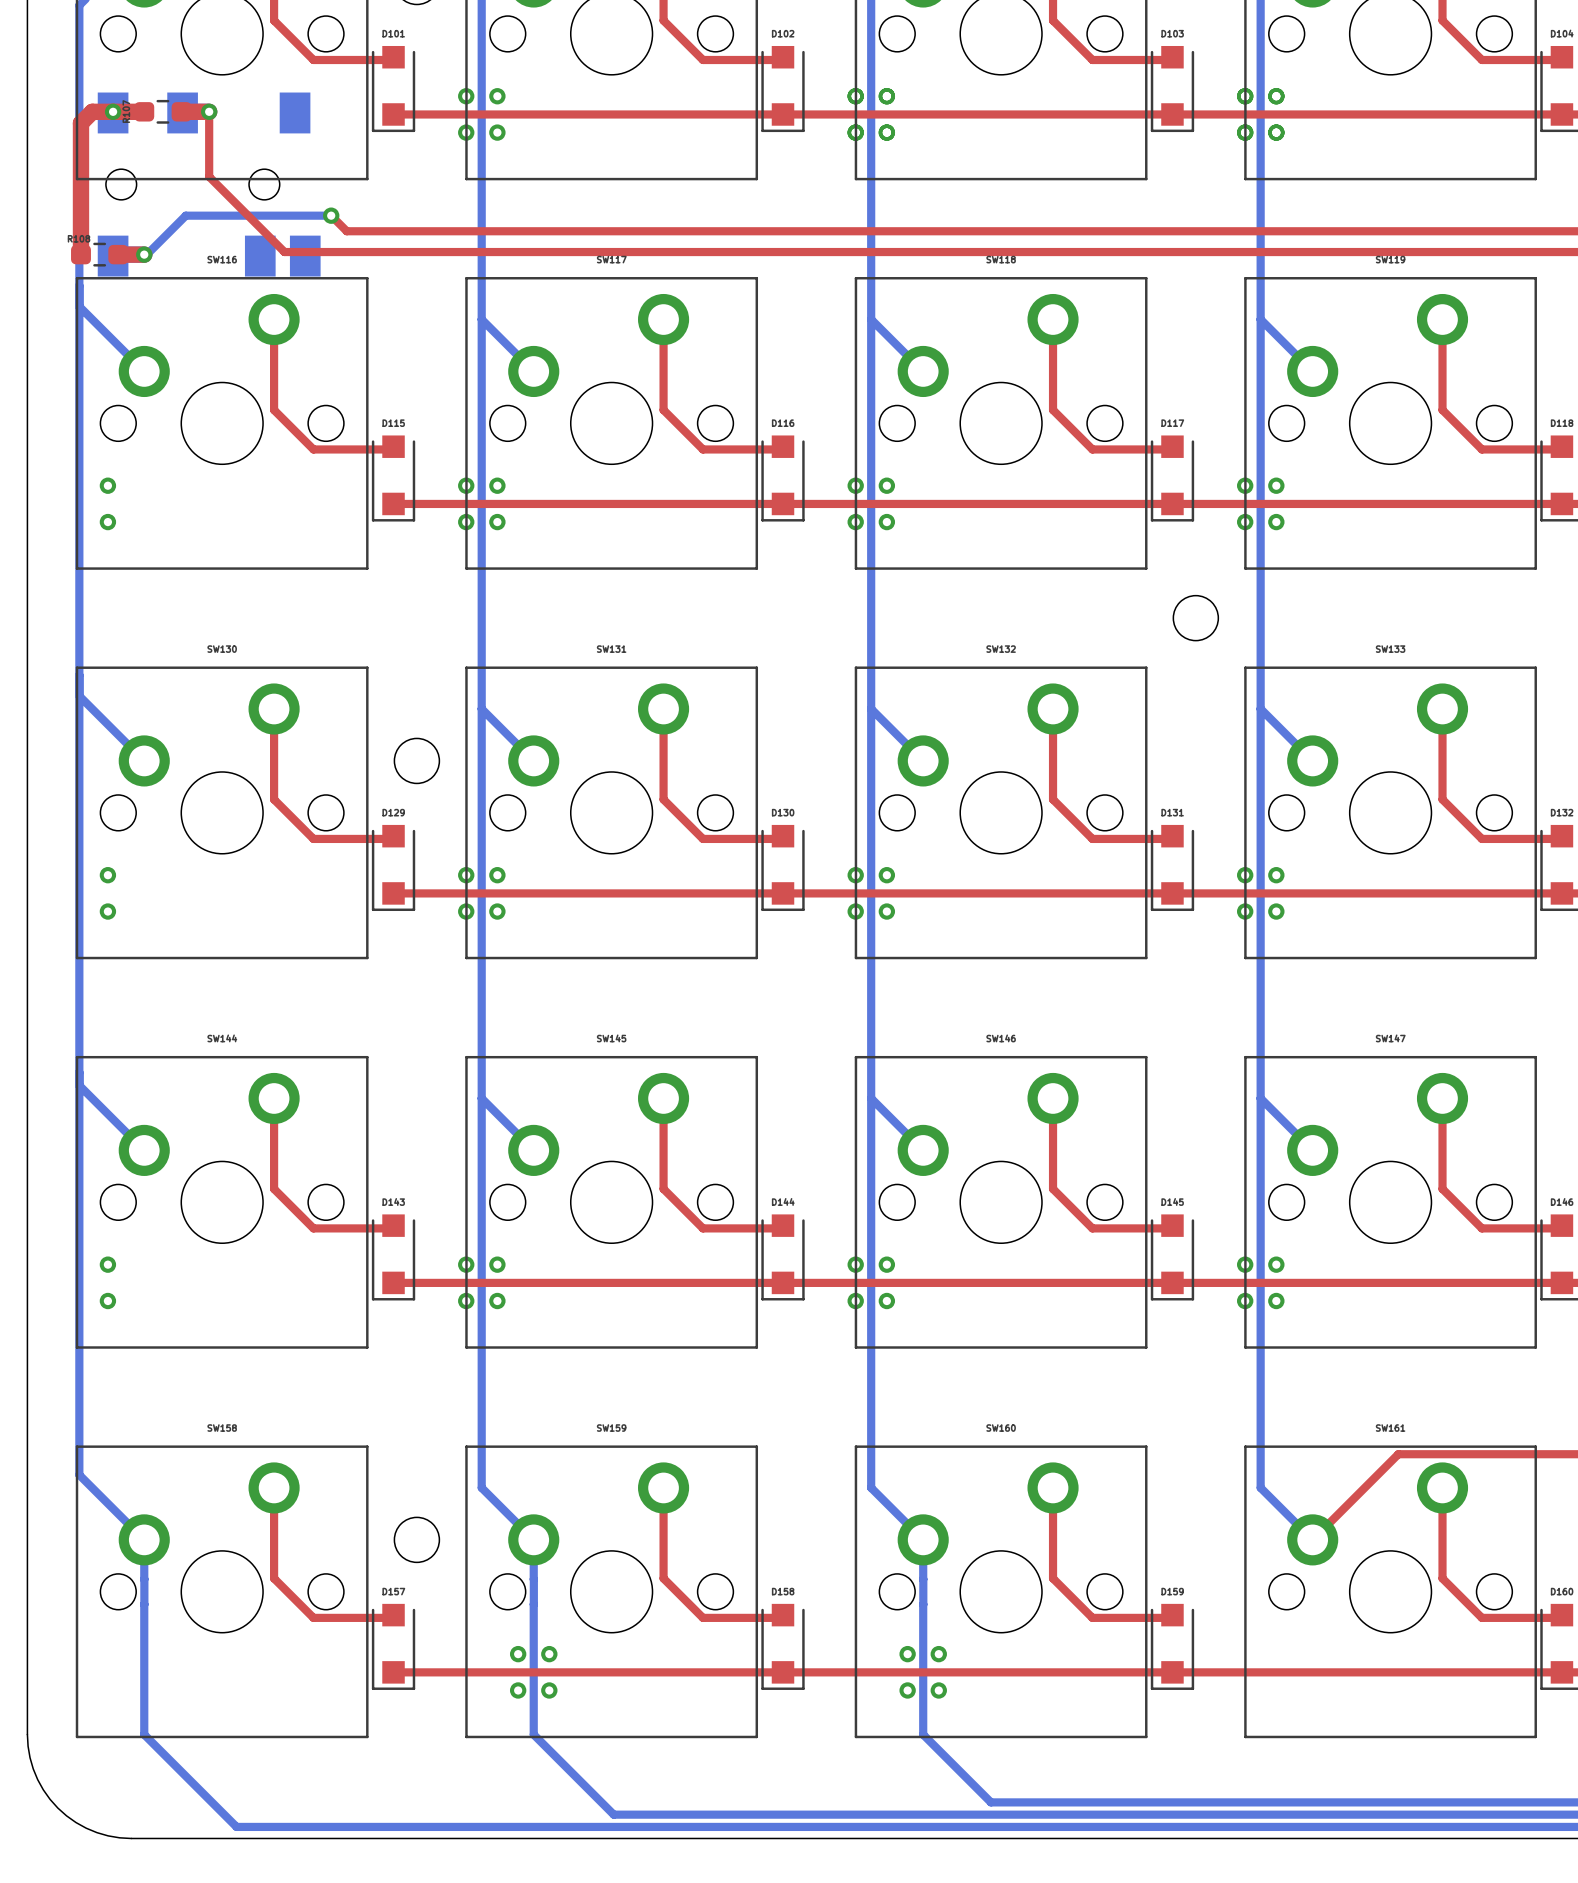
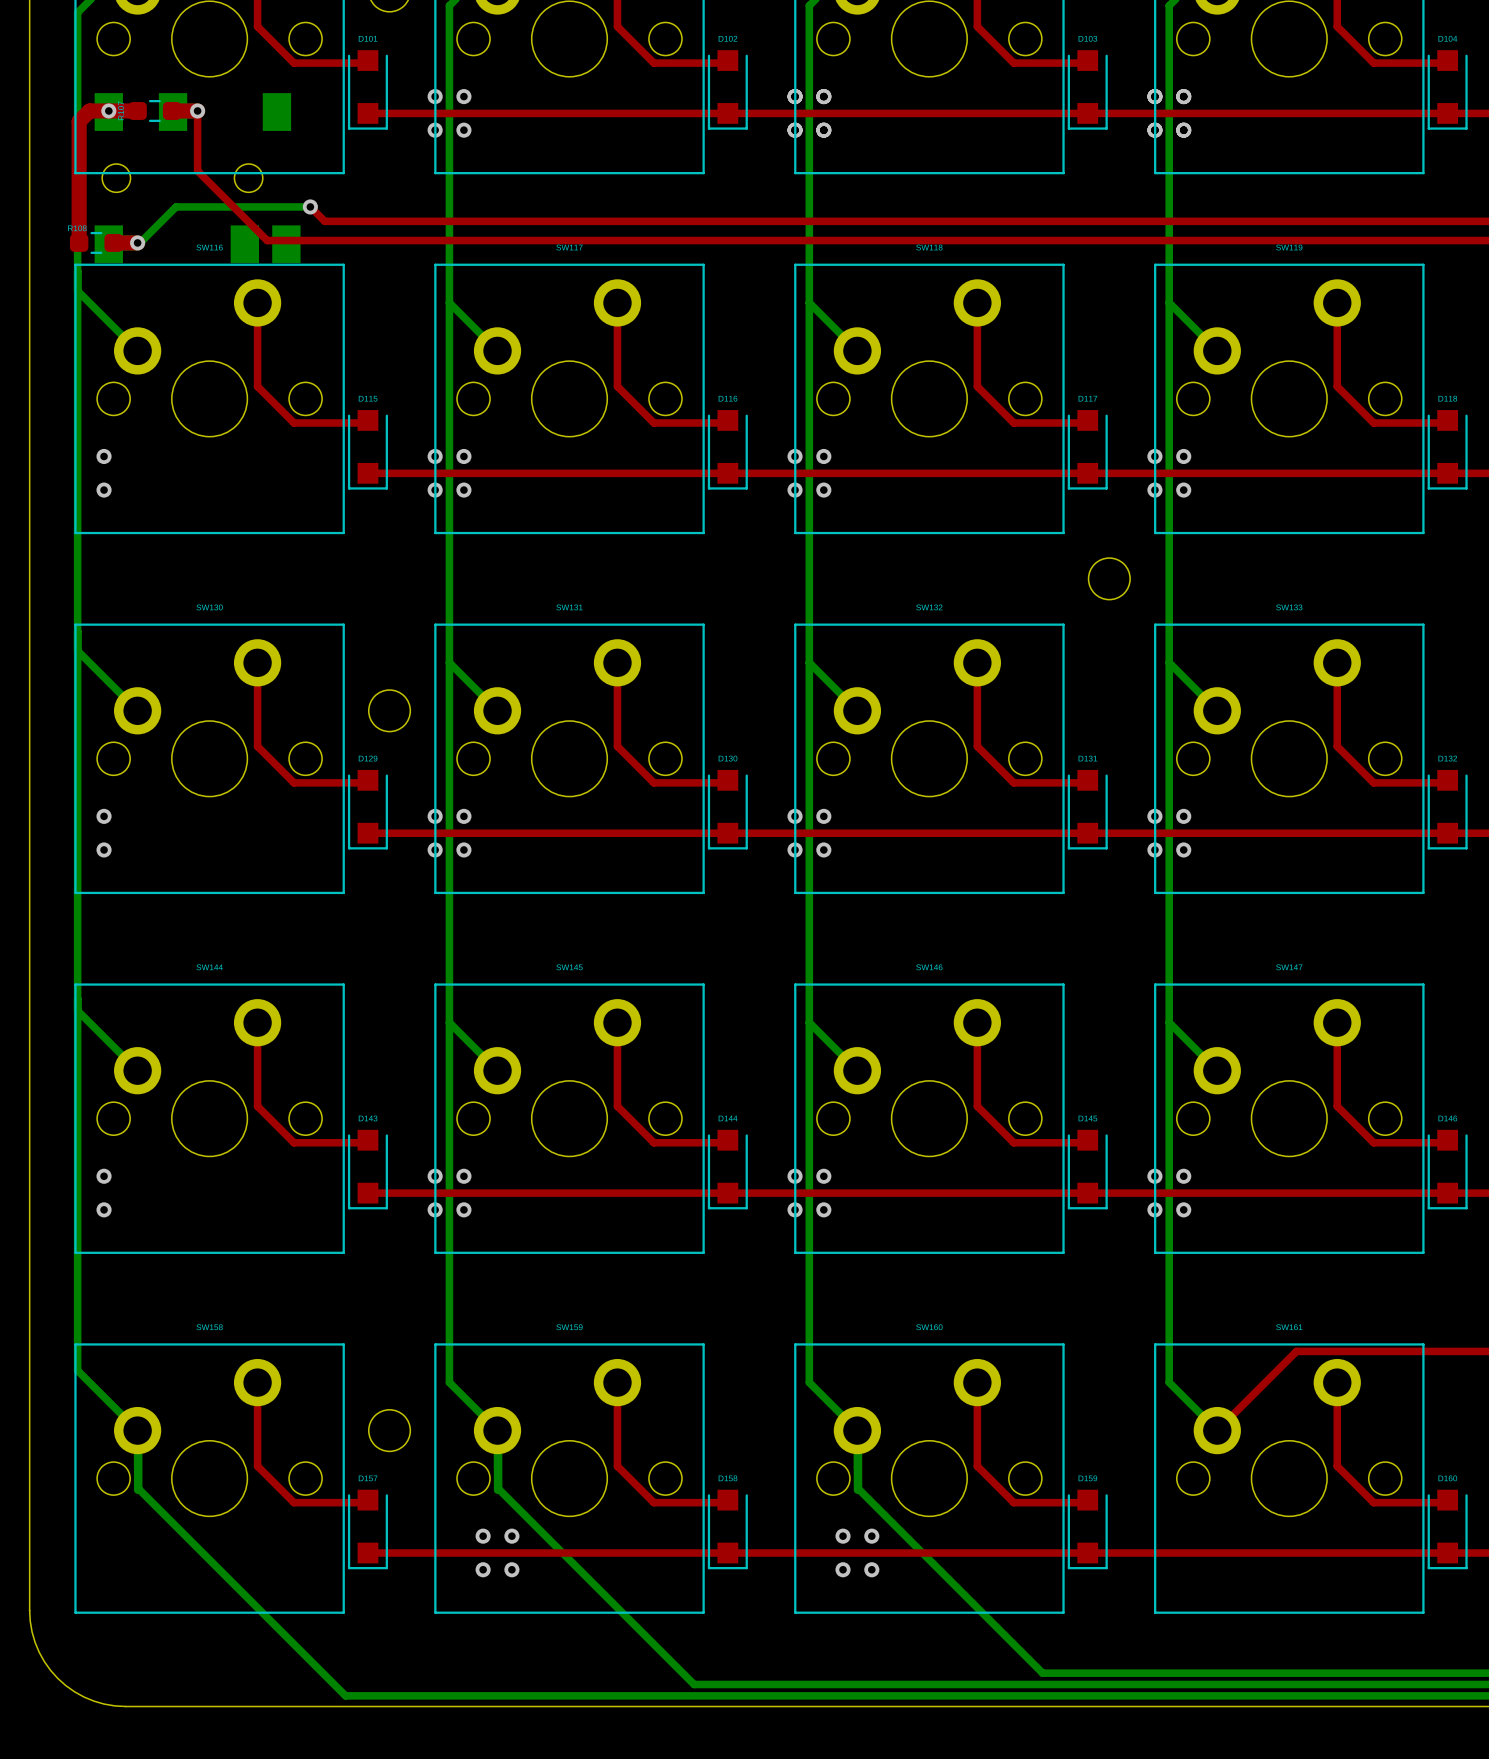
bottom track: (144, 1604) (144, 1734) (236, 1826) (369, 1826) -> (137, 1430) (138, 1488) (345, 1695)
bottom track: (533, 1604) (533, 1734) (613, 1814) (746, 1814) -> (497, 1430) (498, 1488) (694, 1684)
bottom track: (923, 1604) (923, 1734) (990, 1802) (1123, 1802) -> (857, 1430) (858, 1488) (1042, 1673)

